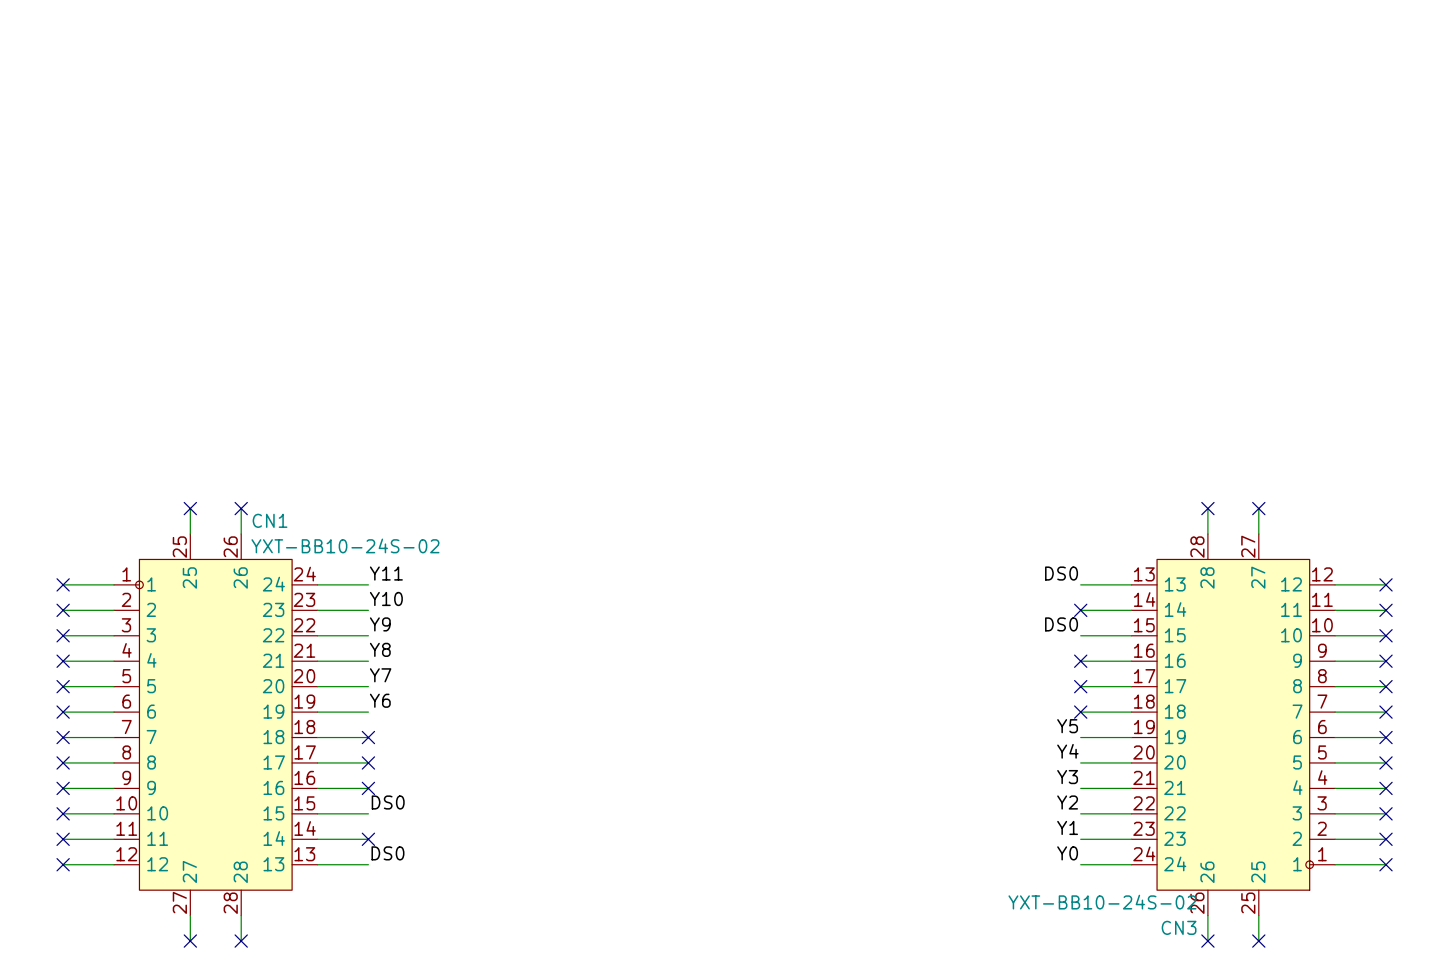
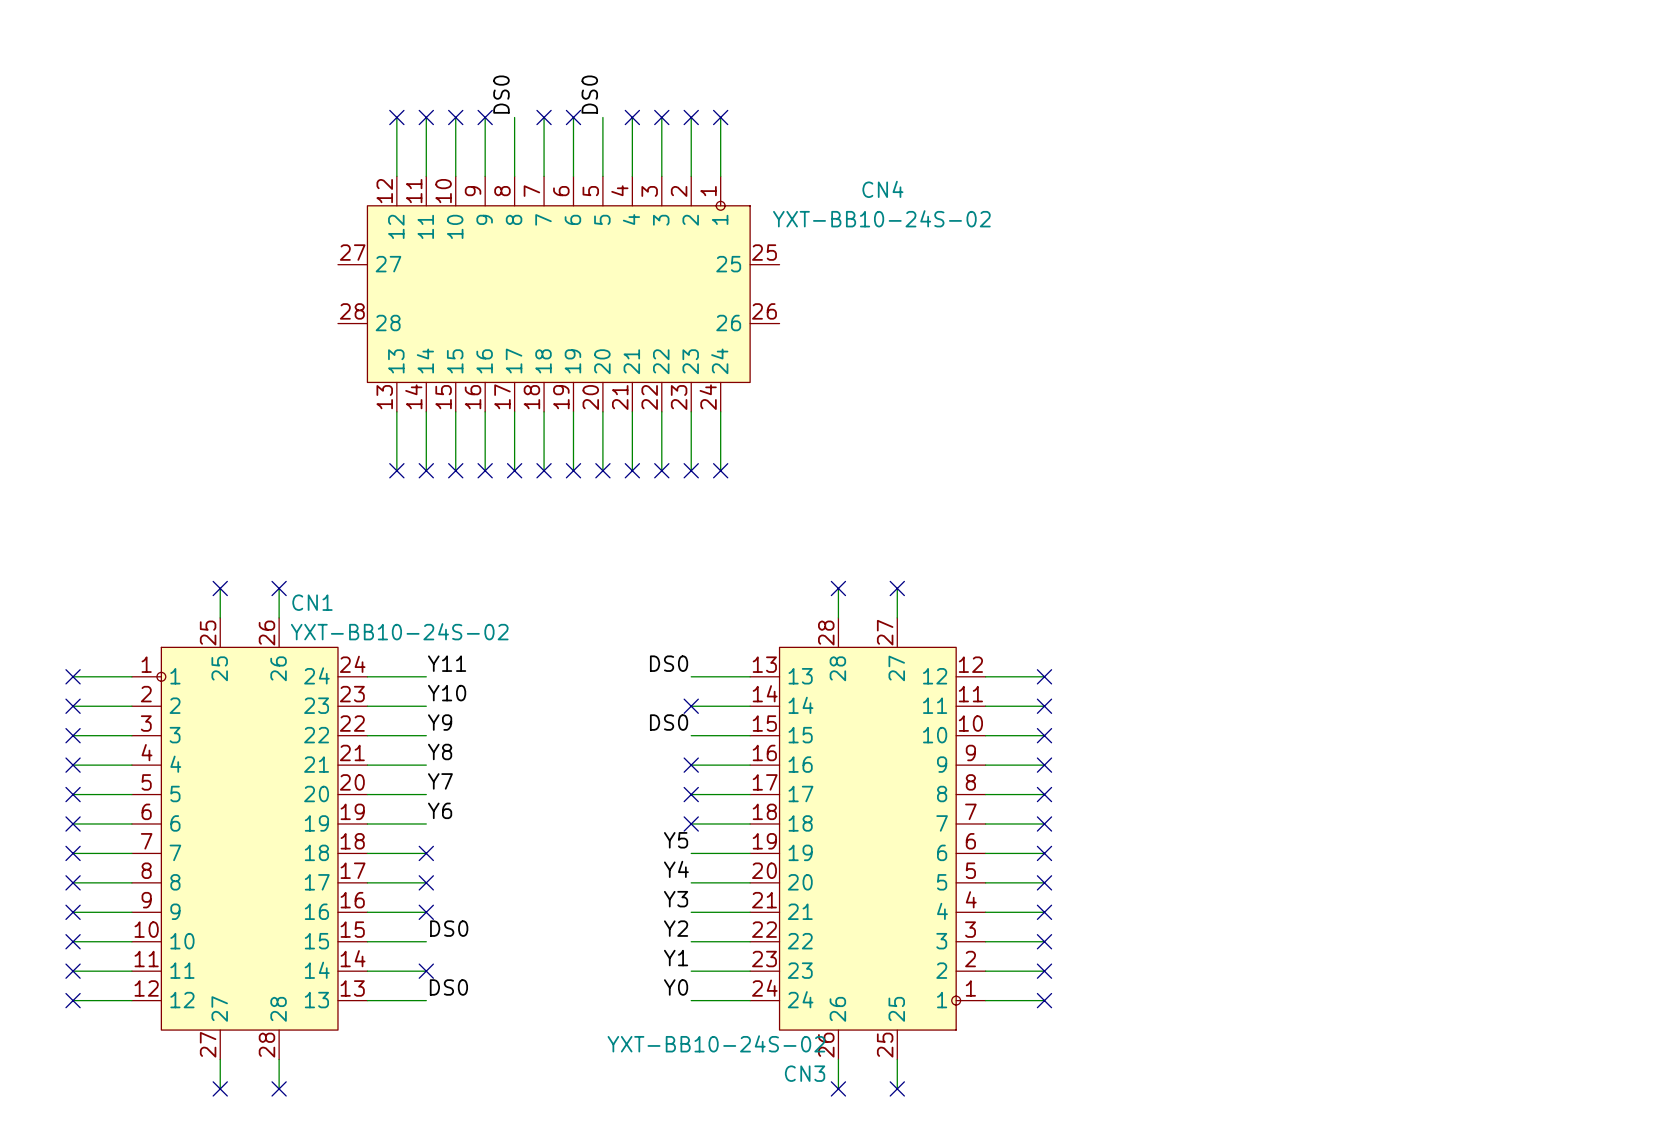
label: none -> DS0 (501, 94)
label: none -> DS0 (589, 94)
wire: none -> (396, 117) (396, 176)
no-connect mark: none -> (396, 117)
wire: none -> (426, 117) (426, 176)
no-connect mark: none -> (426, 117)
wire: none -> (455, 117) (455, 176)
no-connect mark: none -> (455, 117)
wire: none -> (485, 117) (485, 176)
no-connect mark: none -> (485, 117)
wire: none -> (514, 117) (514, 176)
wire: none -> (544, 117) (544, 176)
no-connect mark: none -> (544, 117)
wire: none -> (573, 117) (573, 176)
no-connect mark: none -> (573, 117)
wire: none -> (602, 117) (602, 176)
wire: none -> (632, 117) (632, 176)
no-connect mark: none -> (632, 117)
wire: none -> (661, 117) (661, 176)
no-connect mark: none -> (661, 117)
wire: none -> (691, 117) (691, 176)
no-connect mark: none -> (691, 117)
wire: none -> (720, 117) (720, 176)
no-connect mark: none -> (720, 117)
CN4: none -> YXT-BB10-24S-02 (558, 294)
wire: none -> (396, 411) (396, 470)
wire: none -> (426, 411) (426, 470)
wire: none -> (455, 411) (455, 470)
wire: none -> (485, 411) (485, 470)
wire: none -> (514, 411) (514, 470)
wire: none -> (544, 411) (544, 470)
wire: none -> (573, 411) (573, 470)
wire: none -> (602, 411) (602, 470)
wire: none -> (632, 411) (632, 470)
wire: none -> (661, 411) (661, 470)
wire: none -> (691, 411) (691, 470)
wire: none -> (720, 411) (720, 470)
no-connect mark: none -> (396, 470)
no-connect mark: none -> (426, 470)
no-connect mark: none -> (455, 470)
no-connect mark: none -> (485, 470)
no-connect mark: none -> (514, 470)
no-connect mark: none -> (544, 470)
no-connect mark: none -> (573, 470)
no-connect mark: none -> (602, 470)
no-connect mark: none -> (632, 470)
no-connect mark: none -> (661, 470)
no-connect mark: none -> (691, 470)
no-connect mark: none -> (720, 470)
wire: none -> (838, 588) (838, 617)
no-connect mark: none -> (838, 588)
wire: none -> (897, 588) (897, 617)
no-connect mark: none -> (897, 588)
wire: (1207, 508) (1207, 534) -> none
no-connect mark: (1207, 508) -> none
wire: (1258, 508) (1258, 534) -> none
no-connect mark: (1258, 508) -> none
label: none -> DS0 (669, 663)
label: DS0 (1061, 573) -> none
wire: none -> (691, 676) (750, 676)
no-connect mark: none -> (1044, 676)
wire: (1080, 584) (1131, 584) -> (985, 676) (1044, 676)
wire: (1335, 584) (1385, 584) -> none
no-connect mark: (1385, 584) -> none
wire: none -> (691, 706) (750, 706)
no-connect mark: none -> (691, 706)
no-connect mark: none -> (1044, 706)
wire: (1080, 610) (1131, 610) -> (985, 706) (1044, 706)
no-connect mark: (1080, 610) -> none
wire: (1335, 610) (1385, 610) -> none
no-connect mark: (1385, 610) -> none
label: none -> DS0 (669, 722)
label: DS0 (1061, 624) -> none
wire: none -> (691, 735) (750, 735)
no-connect mark: none -> (1044, 735)
wire: (1080, 635) (1131, 635) -> (985, 735) (1044, 735)
wire: (1335, 635) (1385, 635) -> none
no-connect mark: (1385, 635) -> none
wire: none -> (691, 765) (750, 765)
no-connect mark: none -> (691, 765)
no-connect mark: none -> (1044, 765)
wire: (1080, 661) (1131, 661) -> (985, 765) (1044, 765)
no-connect mark: (1080, 661) -> none
wire: (1335, 661) (1385, 661) -> none
no-connect mark: (1385, 661) -> none
wire: none -> (691, 794) (750, 794)
no-connect mark: none -> (691, 794)
no-connect mark: none -> (1044, 794)
wire: (1080, 686) (1131, 686) -> (985, 794) (1044, 794)
no-connect mark: (1080, 686) -> none
wire: (1335, 686) (1385, 686) -> none
no-connect mark: (1385, 686) -> none
wire: none -> (691, 823) (750, 823)
no-connect mark: none -> (691, 823)
no-connect mark: none -> (1044, 823)
wire: (1080, 712) (1131, 712) -> (985, 823) (1044, 823)
no-connect mark: (1080, 712) -> none
wire: (1335, 712) (1385, 712) -> none
no-connect mark: (1385, 712) -> none
CN3 position: (1233, 724) -> (867, 838)
label: none -> Y5 (676, 840)
label: Y5 (1067, 726) -> none
wire: none -> (691, 853) (750, 853)
no-connect mark: none -> (1044, 853)
wire: (1080, 737) (1131, 737) -> (985, 853) (1044, 853)
wire: (1335, 737) (1385, 737) -> none
no-connect mark: (1385, 737) -> none
label: none -> Y4 (676, 869)
label: Y4 (1067, 751) -> none
wire: none -> (691, 882) (750, 882)
no-connect mark: none -> (1044, 882)
wire: (1080, 762) (1131, 762) -> (985, 882) (1044, 882)
wire: (1335, 762) (1385, 762) -> none
no-connect mark: (1385, 762) -> none
label: none -> Y3 (676, 899)
label: Y3 (1067, 777) -> none
wire: none -> (691, 912) (750, 912)
no-connect mark: none -> (1044, 912)
wire: (1080, 788) (1131, 788) -> (985, 912) (1044, 912)
wire: (1335, 788) (1385, 788) -> none
no-connect mark: (1385, 788) -> none
label: none -> Y2 (676, 928)
label: Y2 (1067, 802) -> none
wire: none -> (691, 941) (750, 941)
no-connect mark: none -> (1044, 941)
wire: (1080, 813) (1131, 813) -> (985, 941) (1044, 941)
wire: (1335, 813) (1385, 813) -> none
no-connect mark: (1385, 813) -> none
label: none -> Y1 (676, 958)
label: Y1 (1067, 827) -> none
wire: none -> (691, 971) (750, 971)
no-connect mark: none -> (1044, 971)
wire: (1080, 839) (1131, 839) -> (985, 971) (1044, 971)
wire: (1335, 839) (1385, 839) -> none
no-connect mark: (1385, 839) -> none
label: none -> Y0 (676, 987)
label: Y0 (1067, 853) -> none
wire: none -> (691, 1000) (750, 1000)
no-connect mark: none -> (1044, 1000)
wire: (1080, 864) (1131, 864) -> (985, 1000) (1044, 1000)
wire: (1335, 864) (1385, 864) -> none
no-connect mark: (1385, 864) -> none
wire: none -> (838, 1059) (838, 1088)
wire: none -> (897, 1059) (897, 1088)
wire: (1207, 915) (1207, 941) -> none
wire: (1258, 915) (1258, 941) -> none
no-connect mark: none -> (838, 1088)
no-connect mark: none -> (897, 1088)
no-connect mark: (1207, 941) -> none
no-connect mark: (1258, 941) -> none

